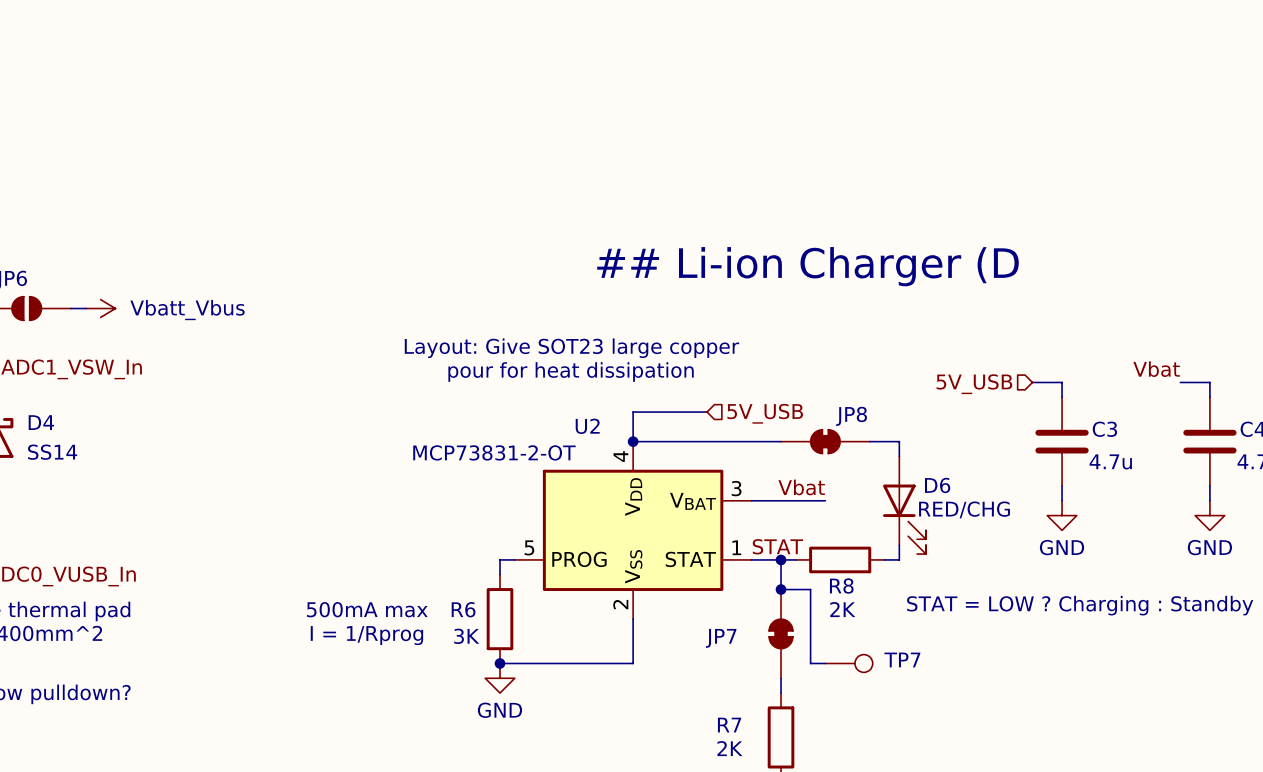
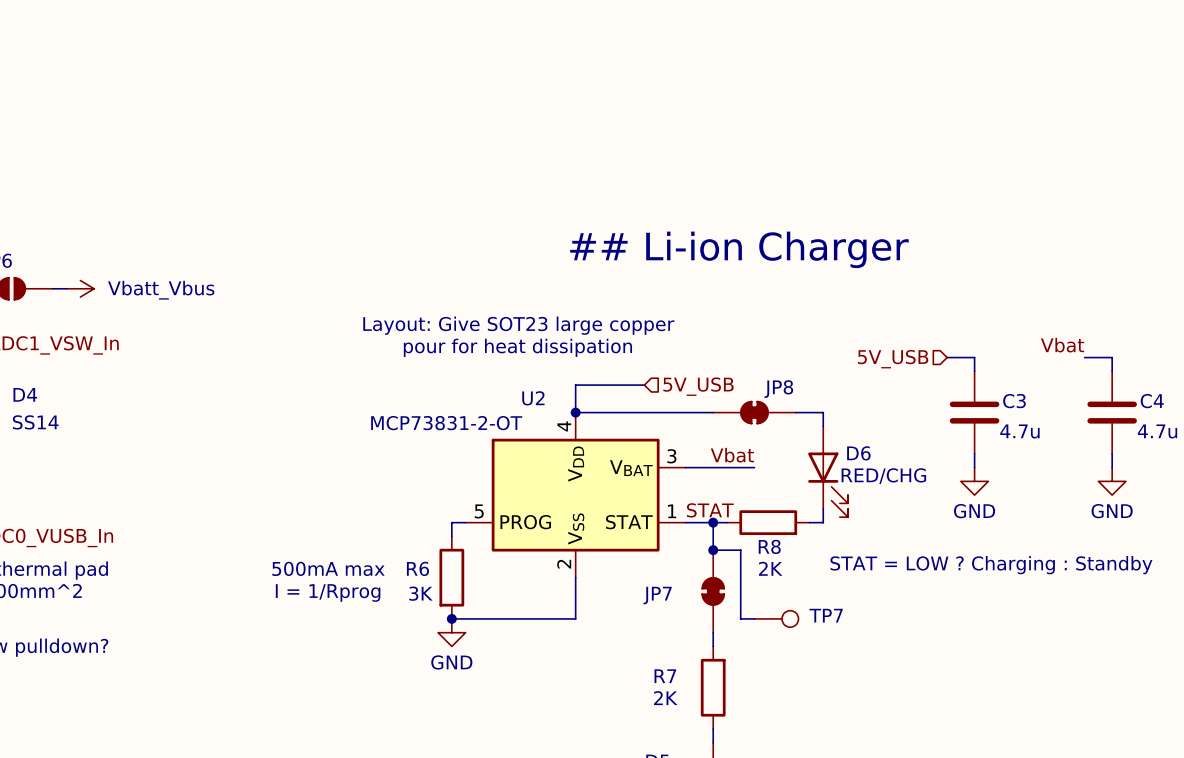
text: ## Li-ion Charger (D (808, 266) -> ## Li-ion Charger (739, 249)

